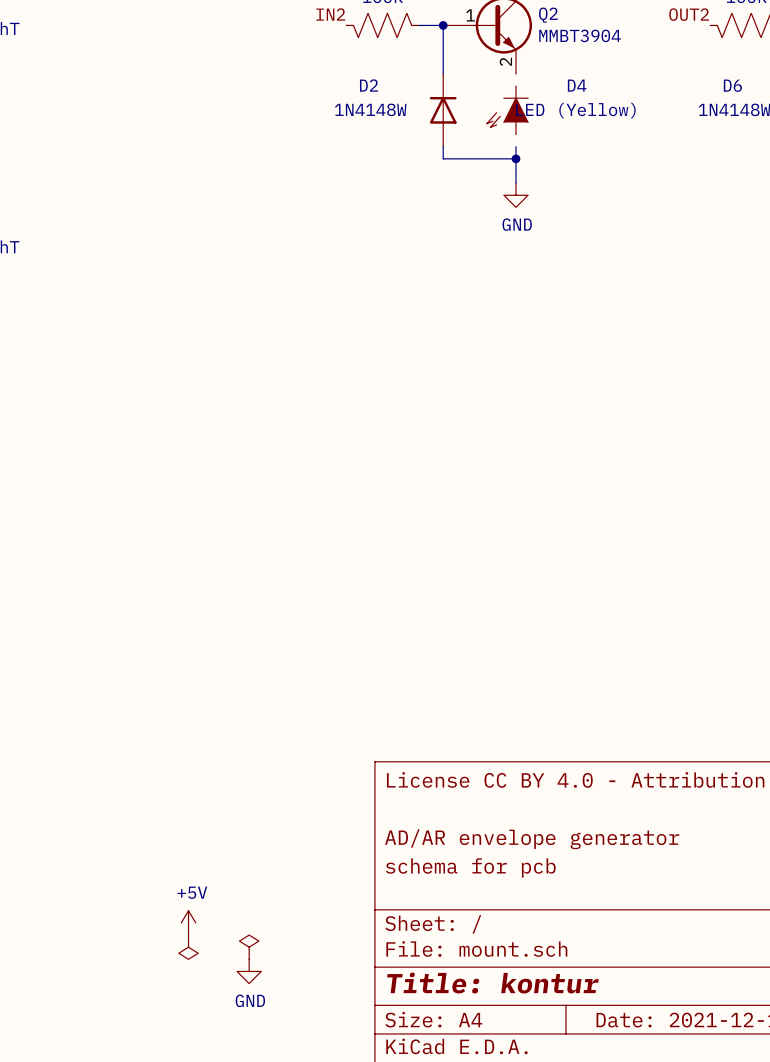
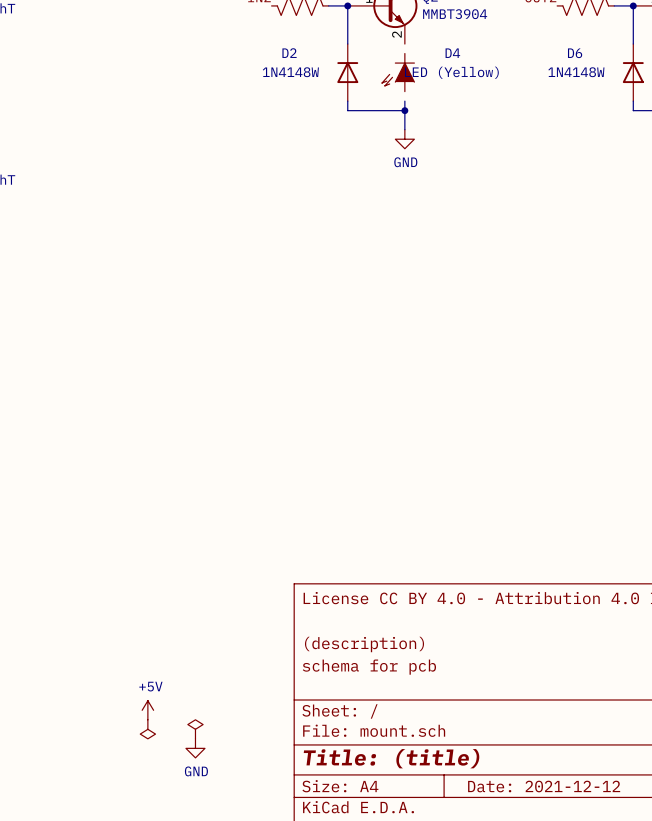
title block: AD/AR envelope generator (532, 839) -> (description) (364, 644)
title block: Title: kontur (492, 983) -> Title: (title) (391, 758)

